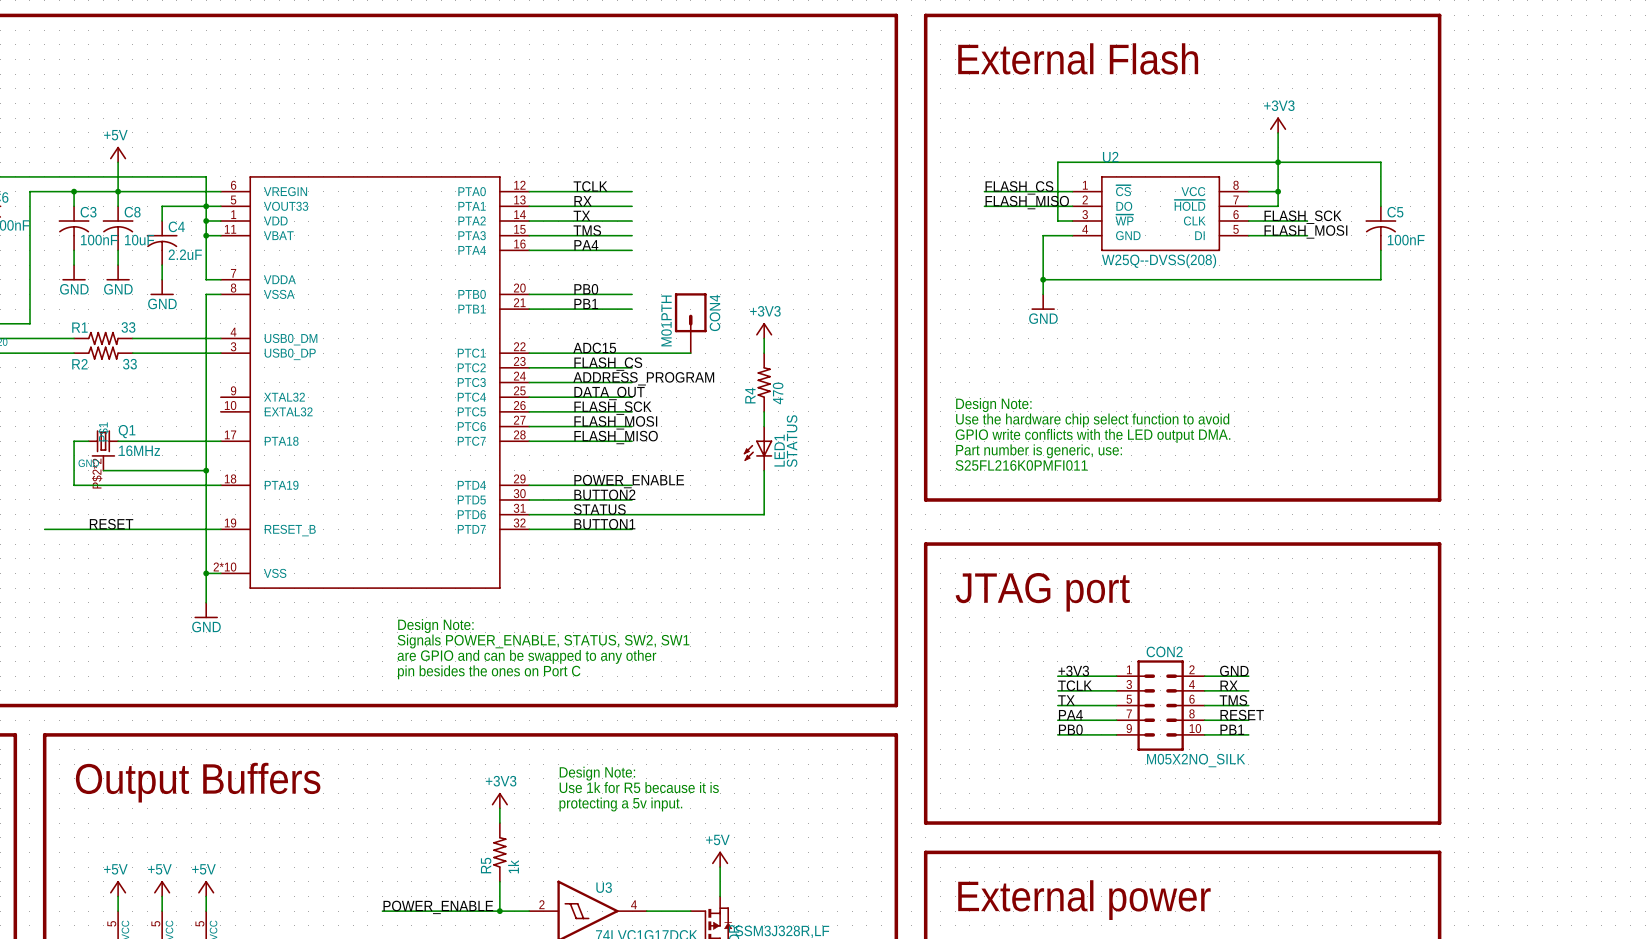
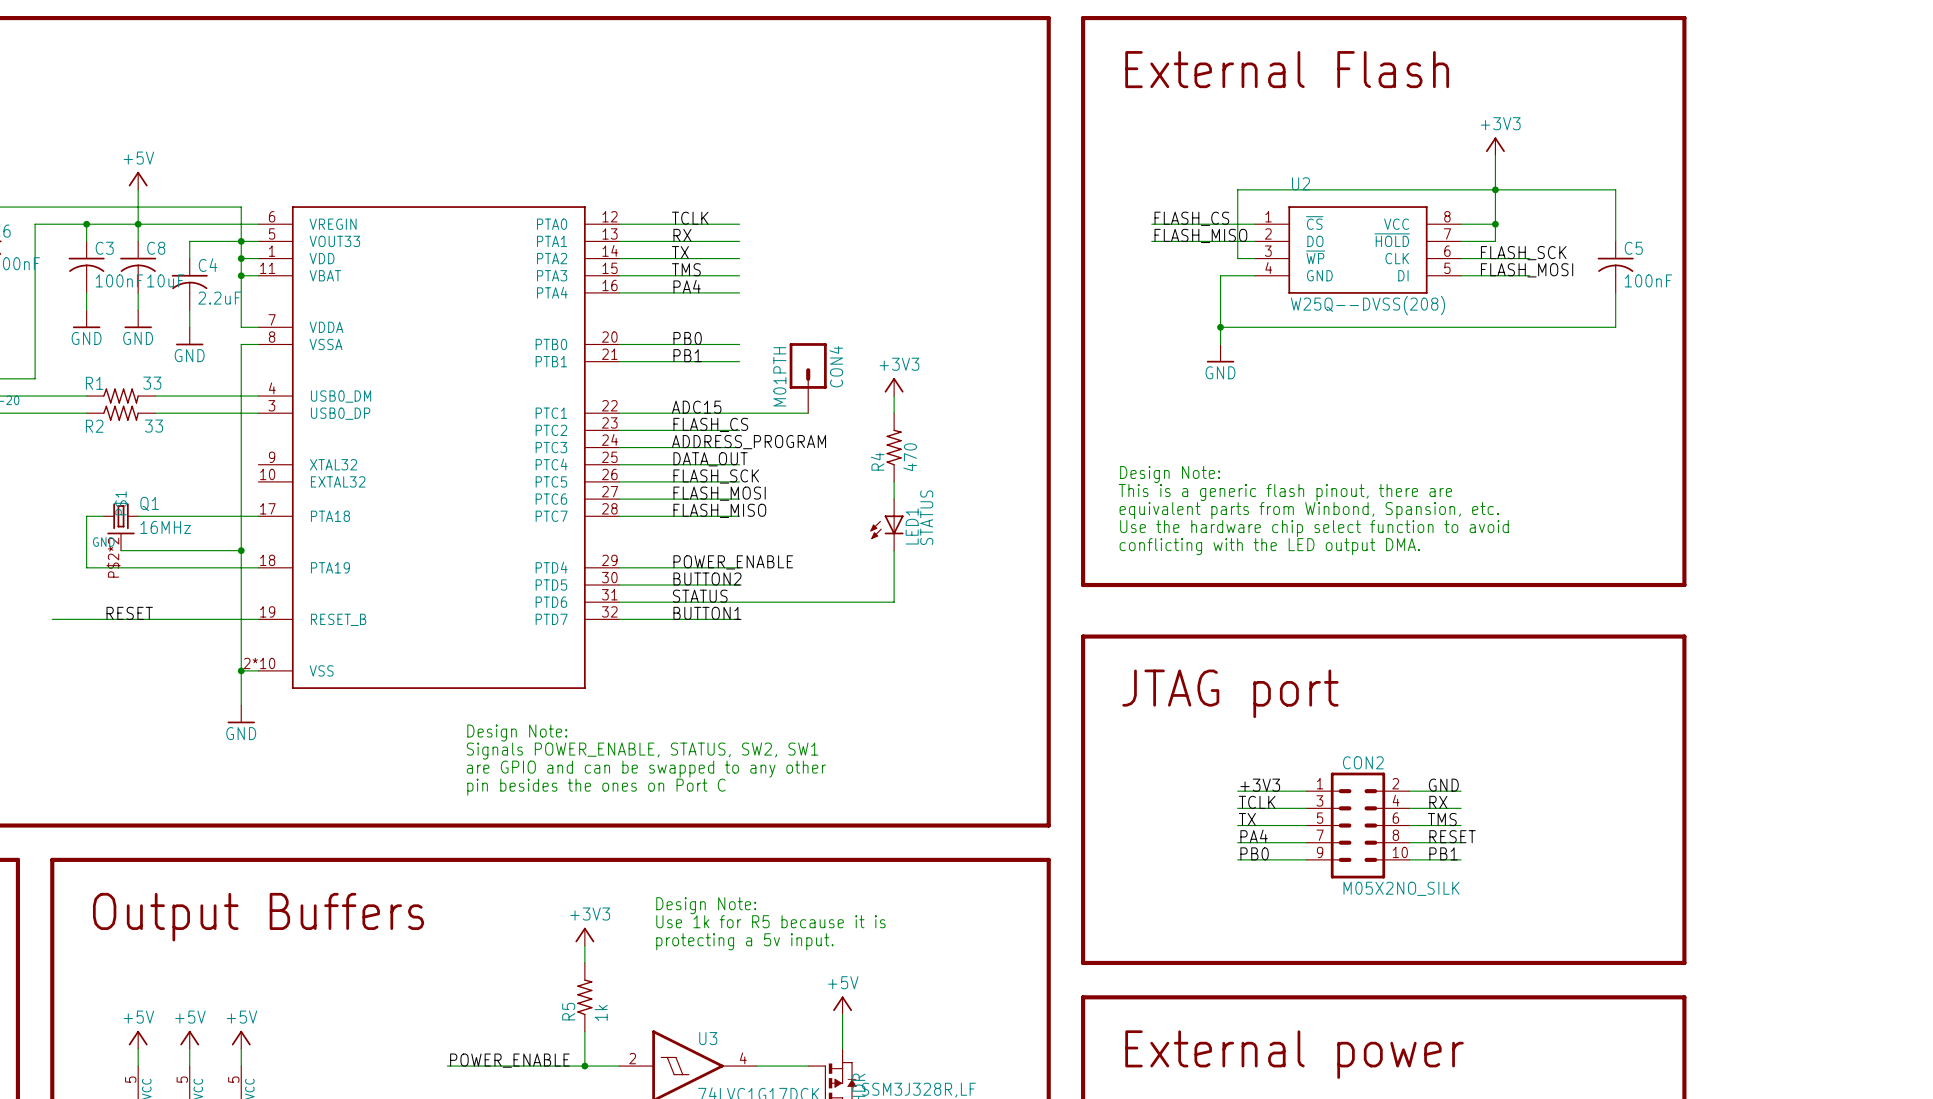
text: Use the hardware chip select function to avoid (1092, 420) -> This is a generic flash pinout, there are (1285, 492)
text: GPIO write conflicts with the LED output DMA. (1093, 435) -> equivalent parts from Winbond, Spansion, etc. (1309, 510)
text: Part number is generic, use: (1039, 451) -> Use the hardware chip select function to avoid (1314, 528)
text: S25FL216K0PMFI011 (1021, 465) -> conflicting with the LED output DMA. (1269, 546)

